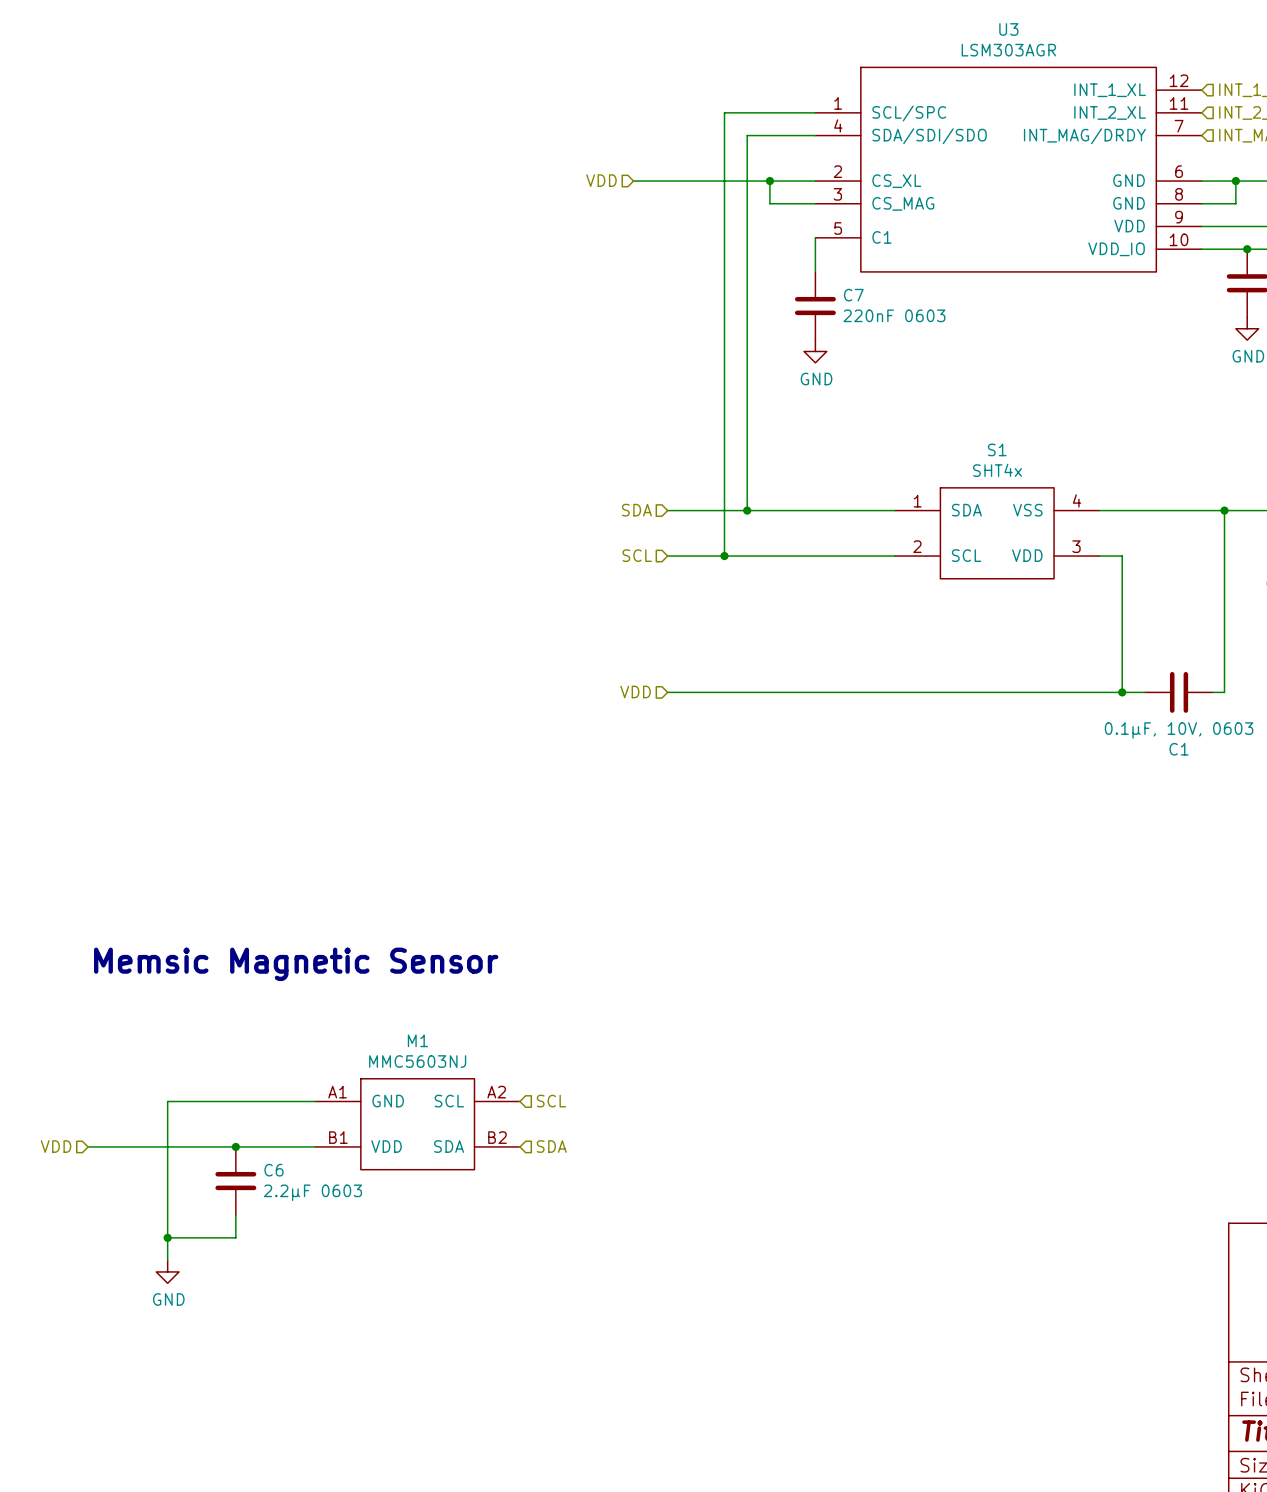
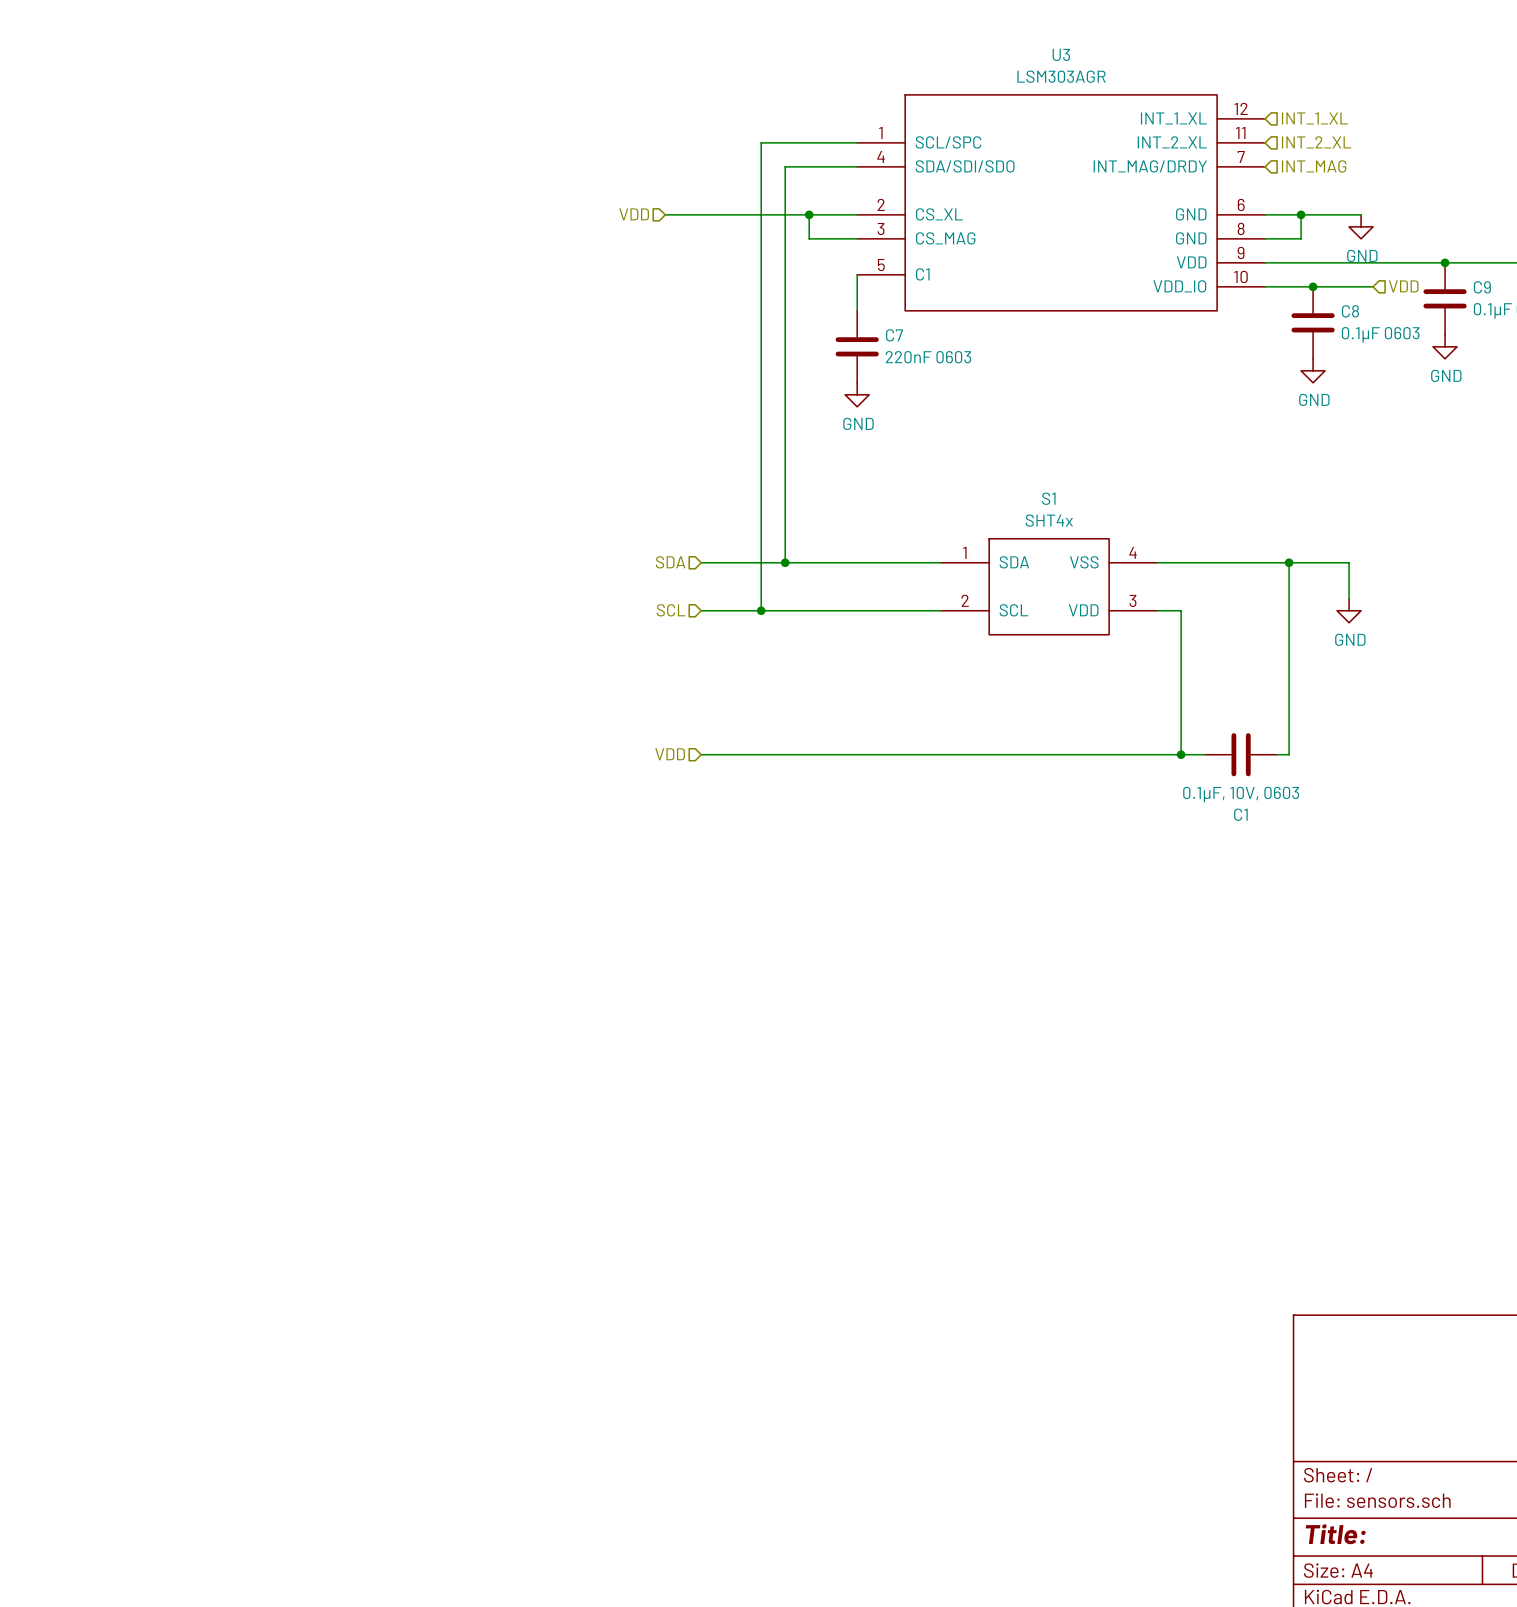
text: Memsic Magnetic Sensor (296, 964) -> none
wire: (315, 1101) (167, 1101) (167, 1260) -> none
hierarchical label: SCL (551, 1101) -> none
M1: MMC5603NJ (417, 1124) -> none
hierarchical label: VDD (56, 1146) -> none
wire: (88, 1146) (315, 1146) -> none
junction: (235, 1146) -> none
hierarchical label: SDA (551, 1146) -> none
C6: 2.2µF 0603 (235, 1181) -> none
wire: (235, 1215) (235, 1237) (167, 1237) -> none
junction: (167, 1237) -> none
power symbol: GND (167, 1271) -> none

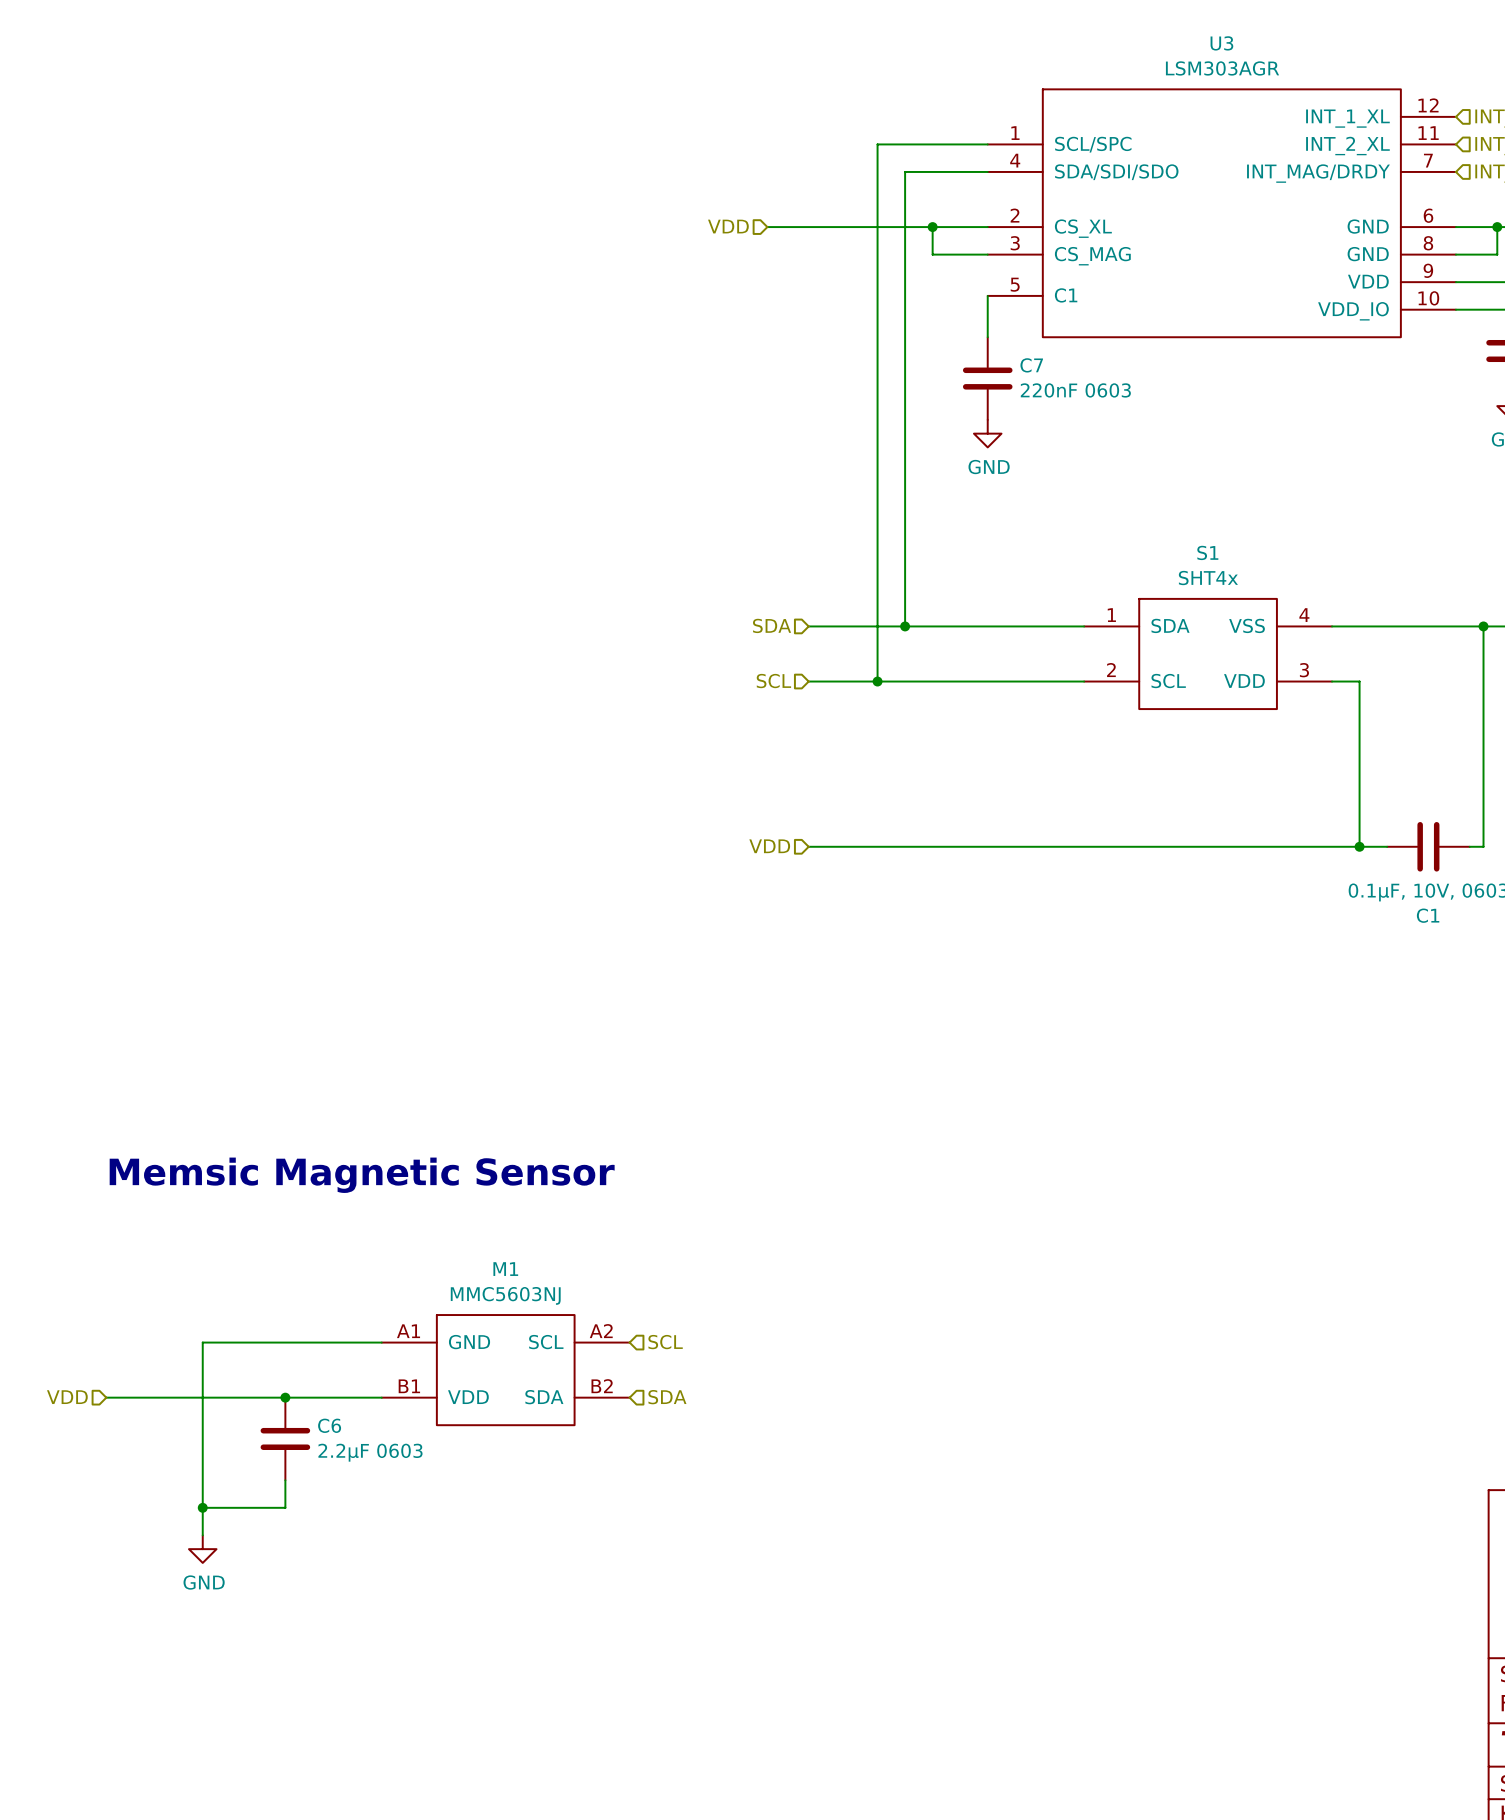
text: none -> Memsic Magnetic Sensor (362, 1175)
wire: none -> (381, 1342) (202, 1342) (202, 1535)
hierarchical label: none -> SCL (665, 1342)
M1: none -> MMC5603NJ (505, 1370)
hierarchical label: none -> VDD (67, 1397)
wire: none -> (106, 1397) (381, 1397)
junction: none -> (285, 1397)
hierarchical label: none -> SDA (667, 1397)
C6: none -> 2.2µF 0603 (285, 1438)
wire: none -> (285, 1480) (285, 1507) (202, 1507)
junction: none -> (202, 1507)
power symbol: none -> GND (202, 1549)

